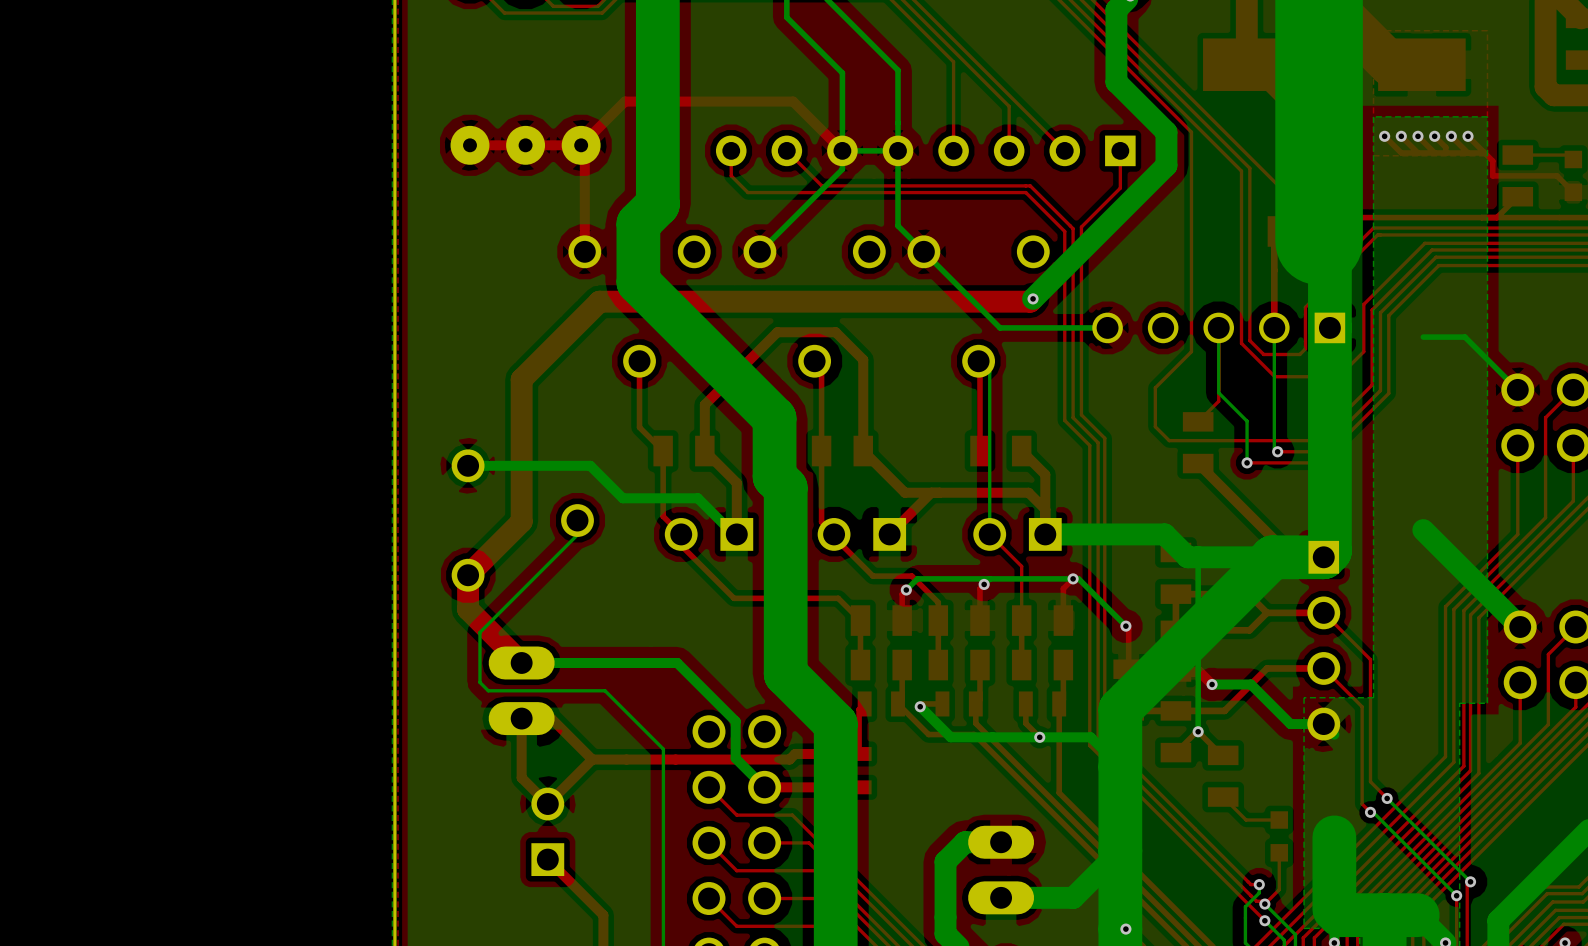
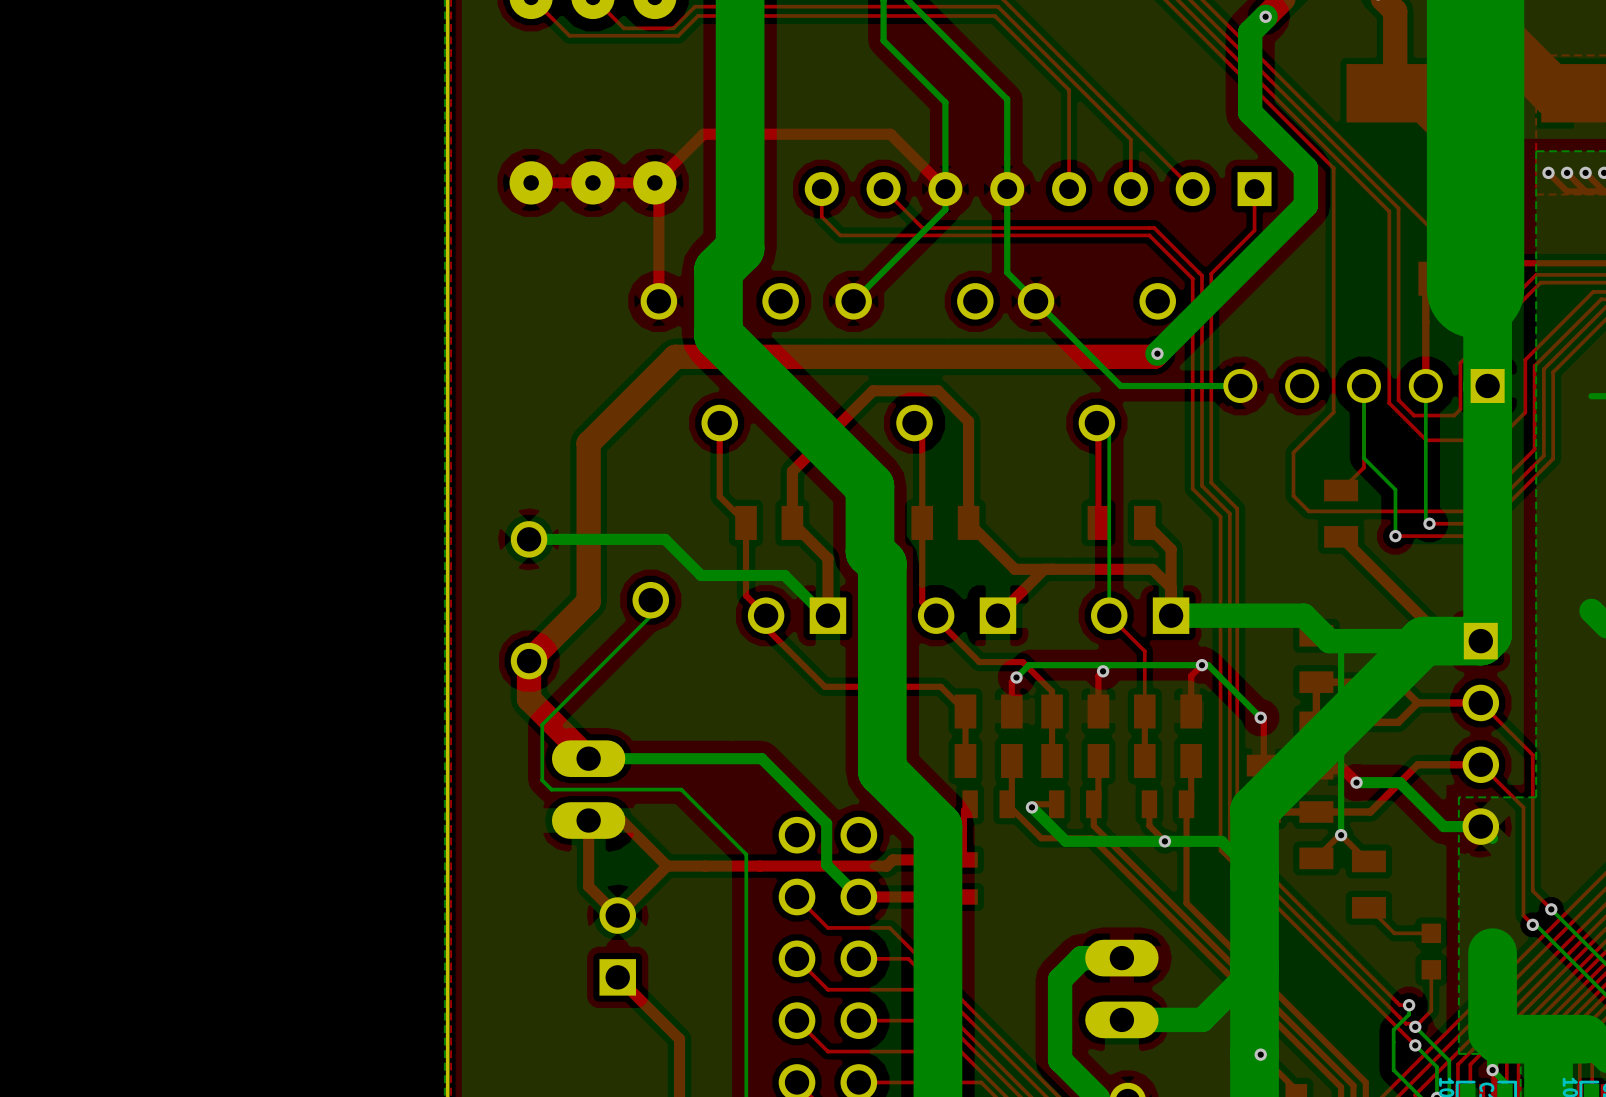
bottom track: (898, 150) (842, 150) -> none

